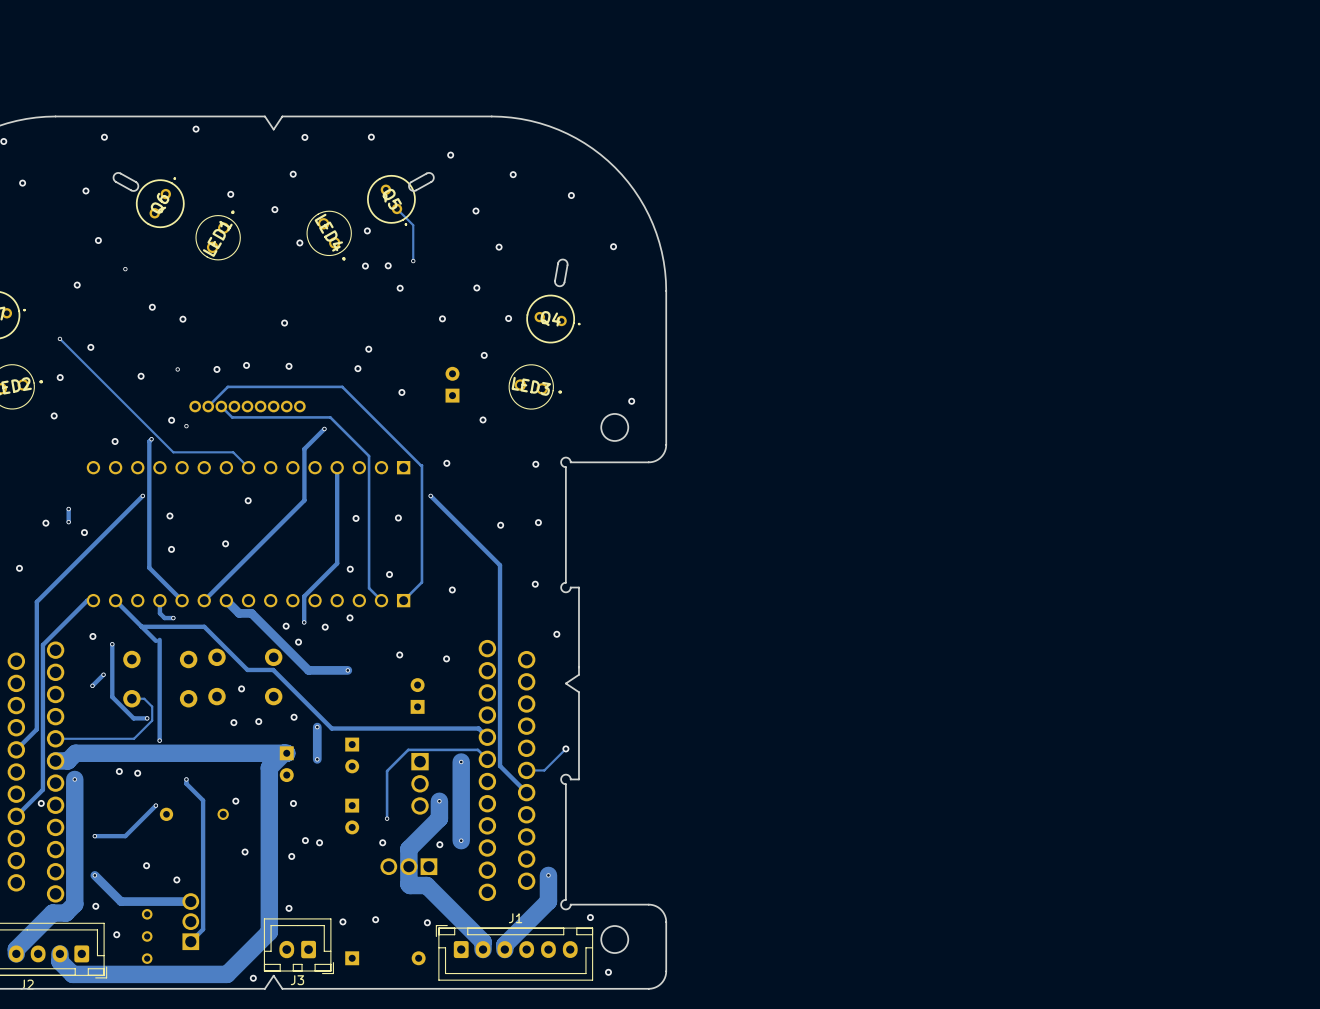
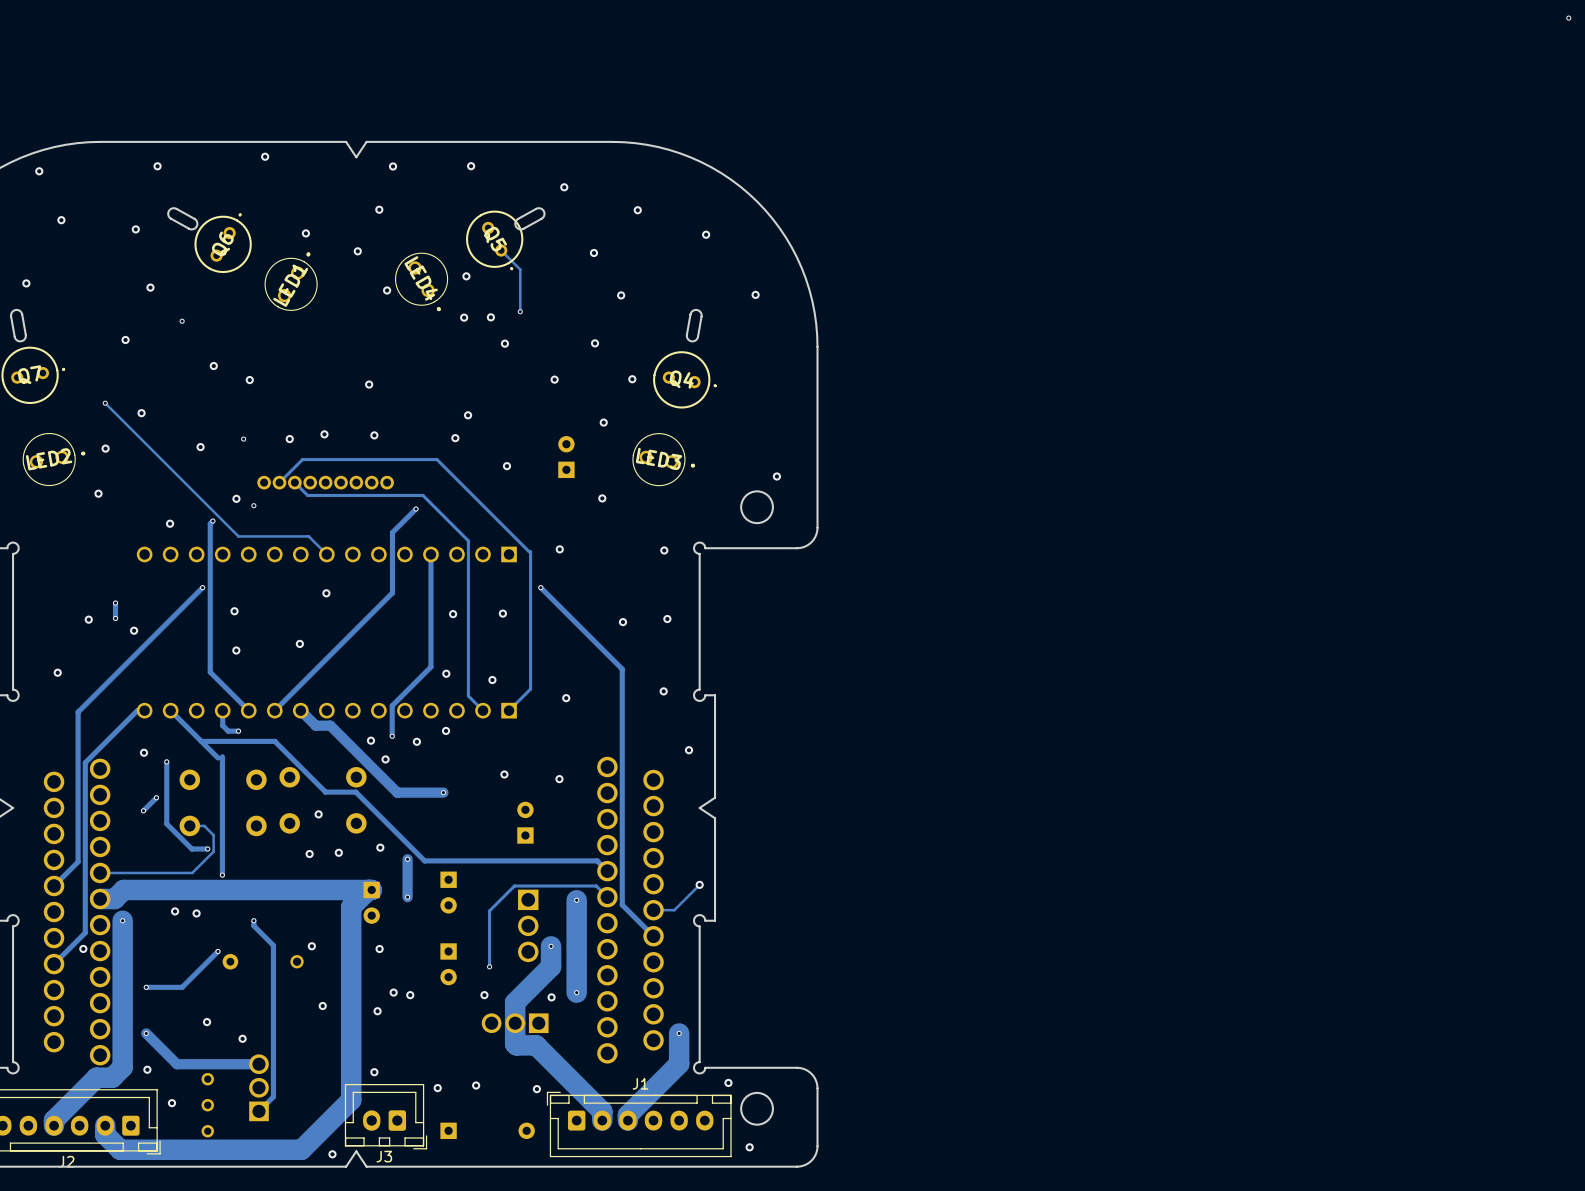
via: none -> (1568, 18)

